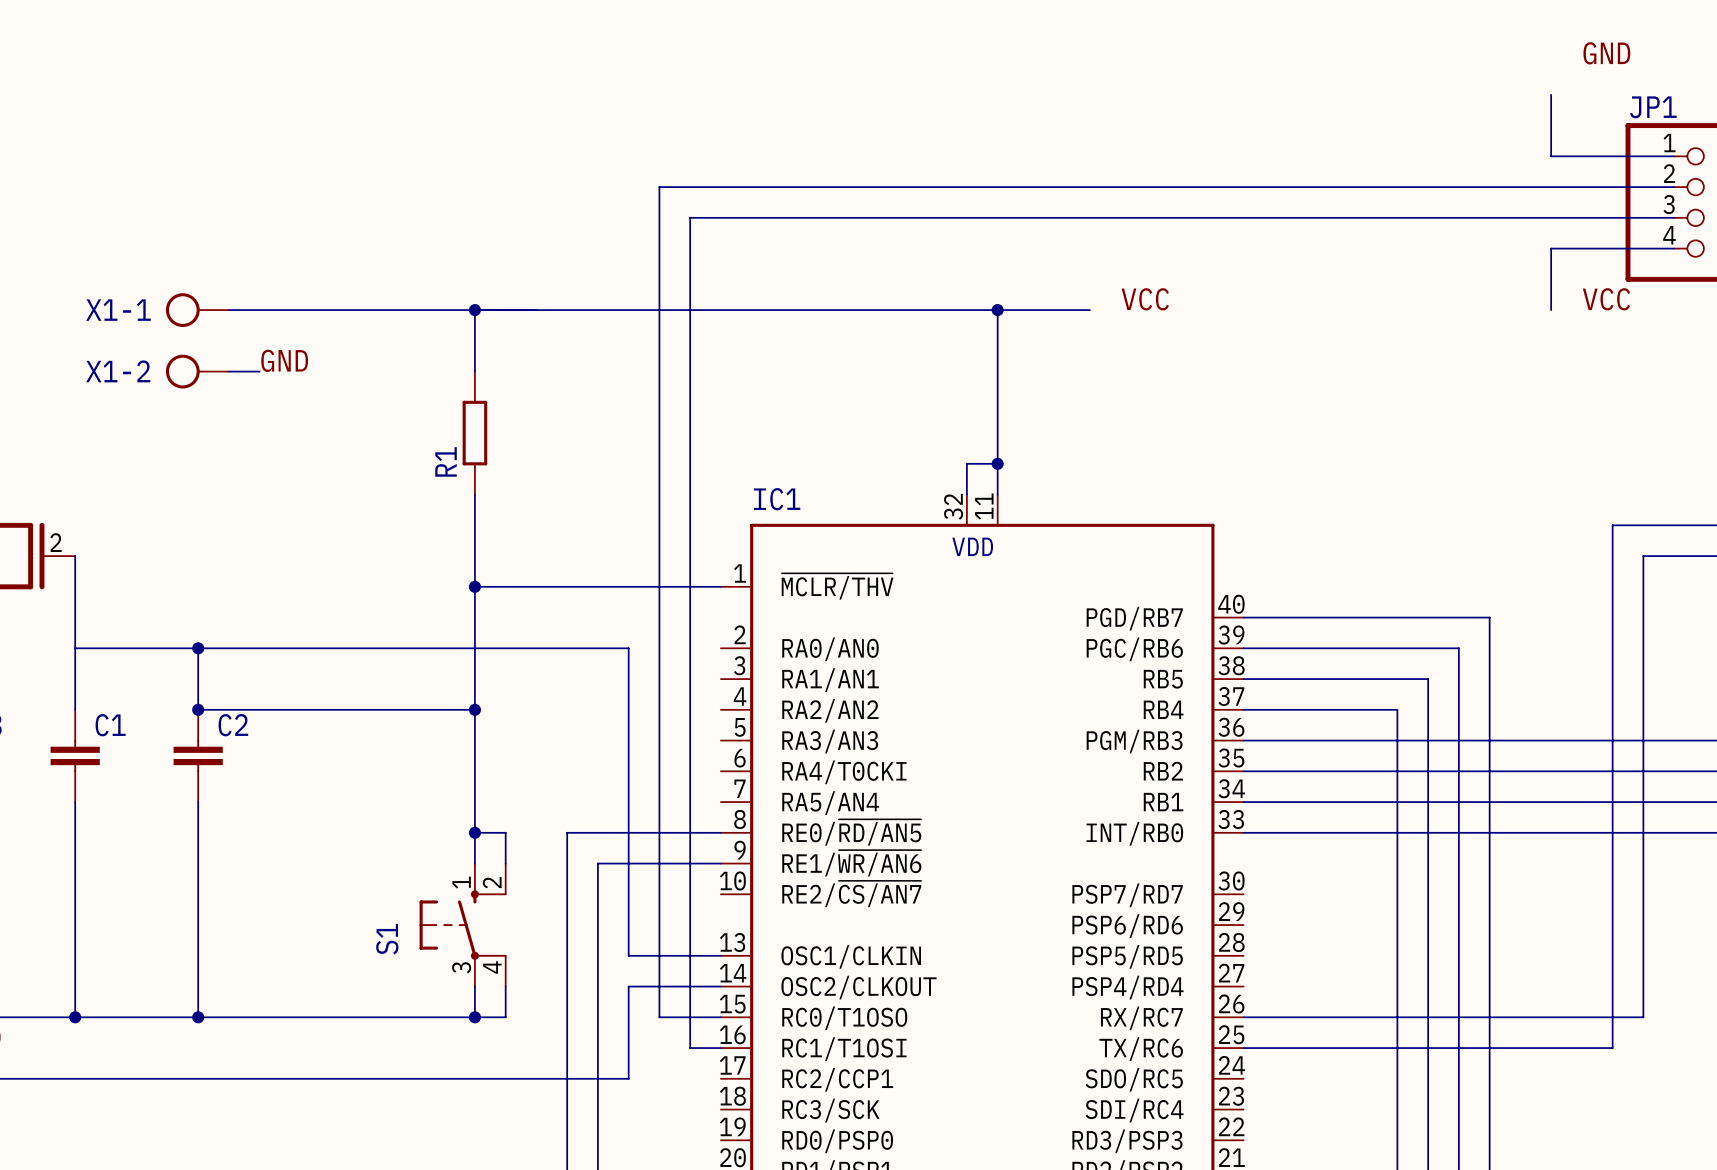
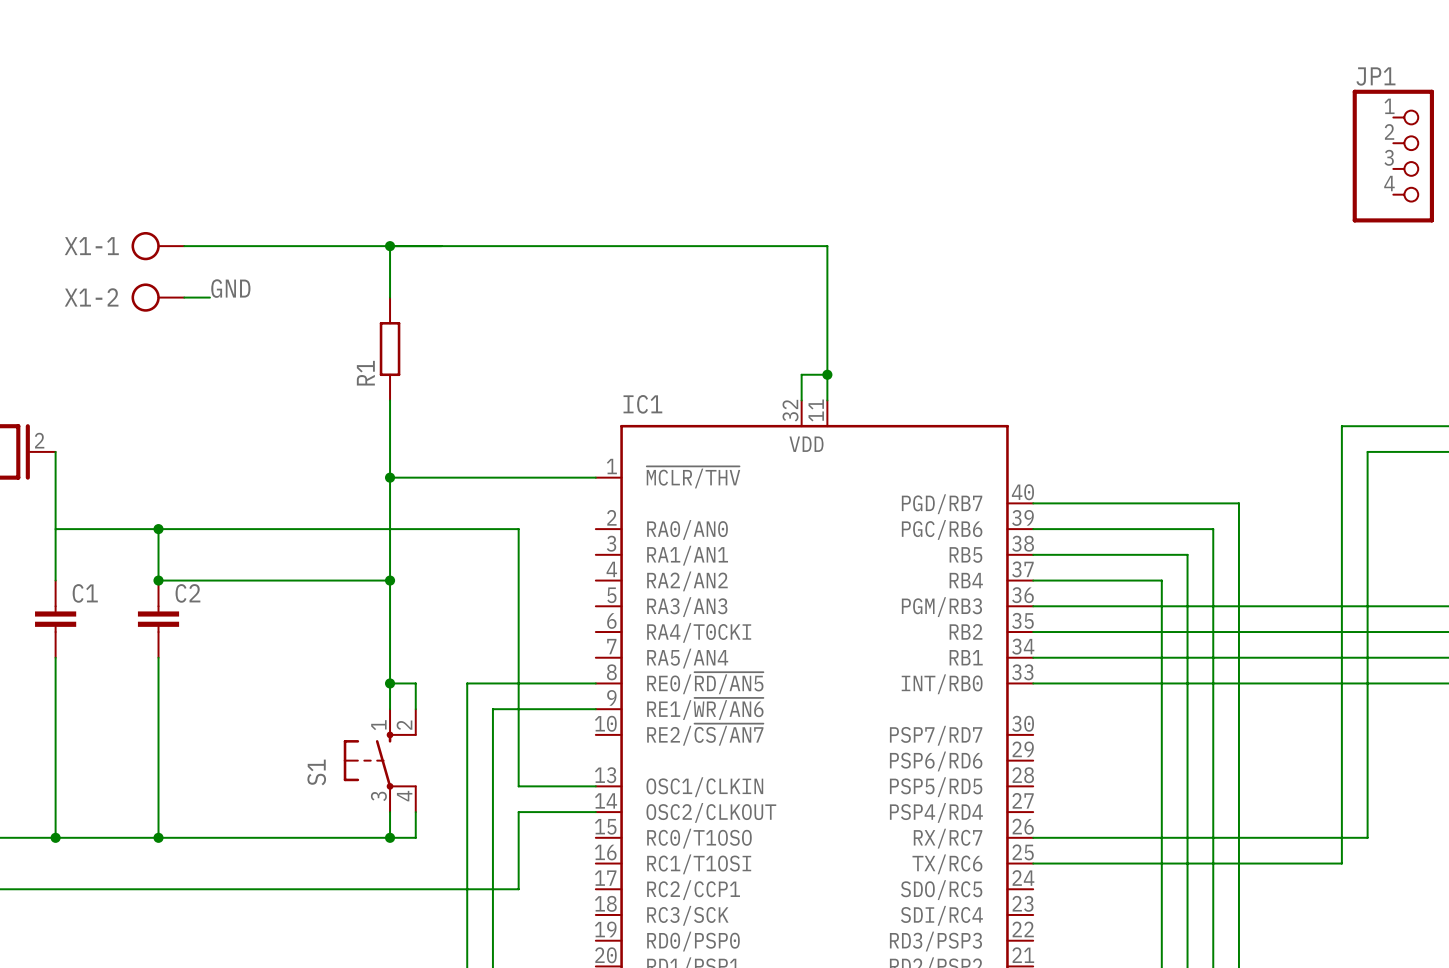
label: GND (1606, 53) -> none
wire: (1551, 94) (1551, 156) (1674, 156) -> none
wire: (1674, 187) (659, 187) (659, 1017) (720, 1017) -> none
wire: (1674, 217) (690, 217) (690, 1048) (720, 1048) -> none
wire: (1674, 248) (1551, 248) (1551, 310) -> none
label: VCC (1145, 299) -> none
label: VCC (1606, 299) -> none
wire: (997, 310) (1089, 310) -> none
junction: (997, 310) -> none

